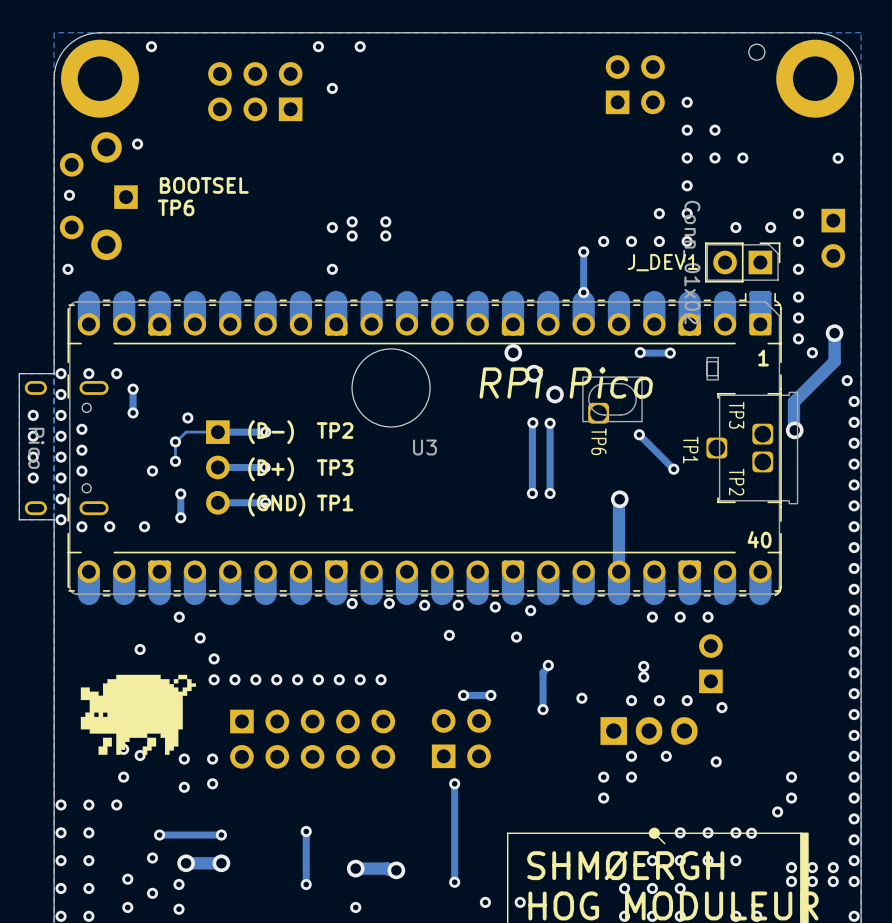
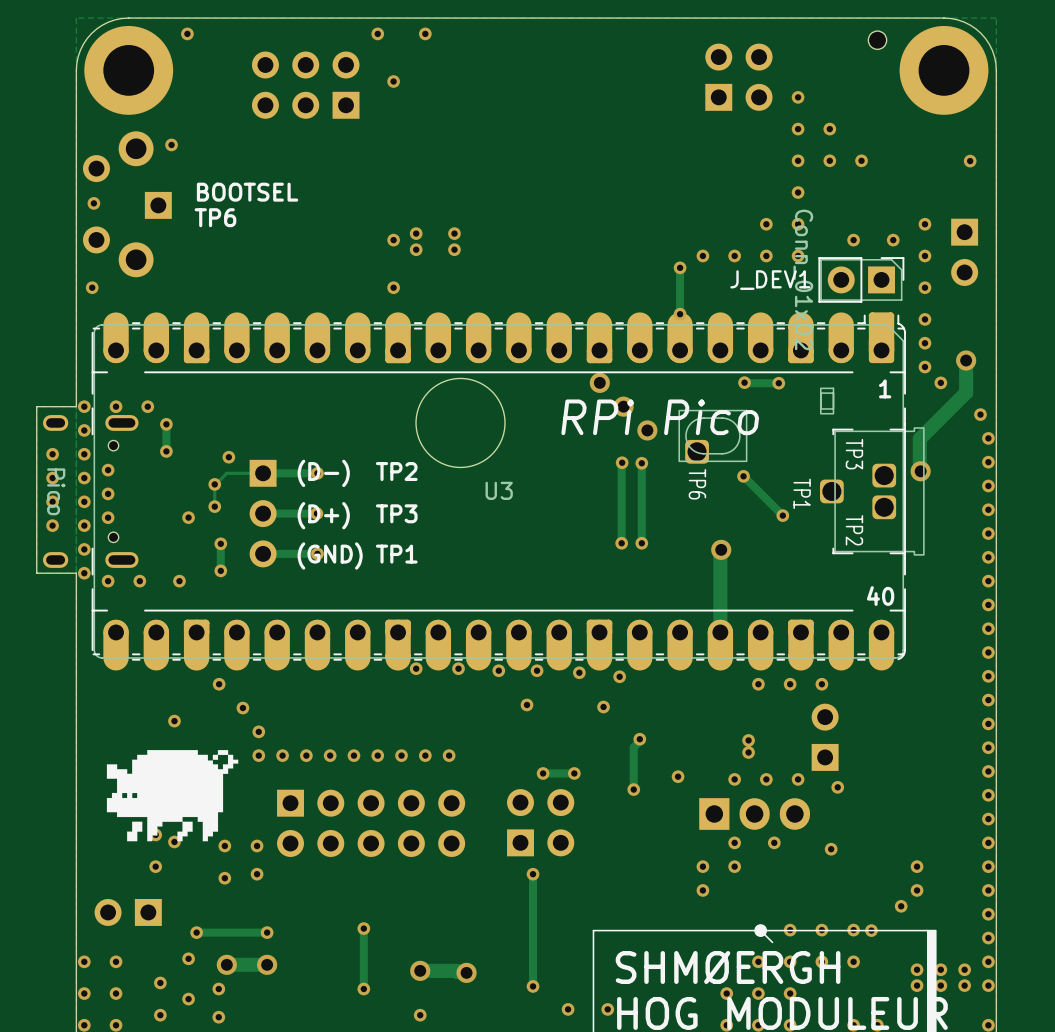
via: (61, 804) -> none
via: (88, 804) -> none
via: (116, 804) -> none
part: none -> (128, 912)
via: (61, 832) -> none
via: (88, 832) -> none

